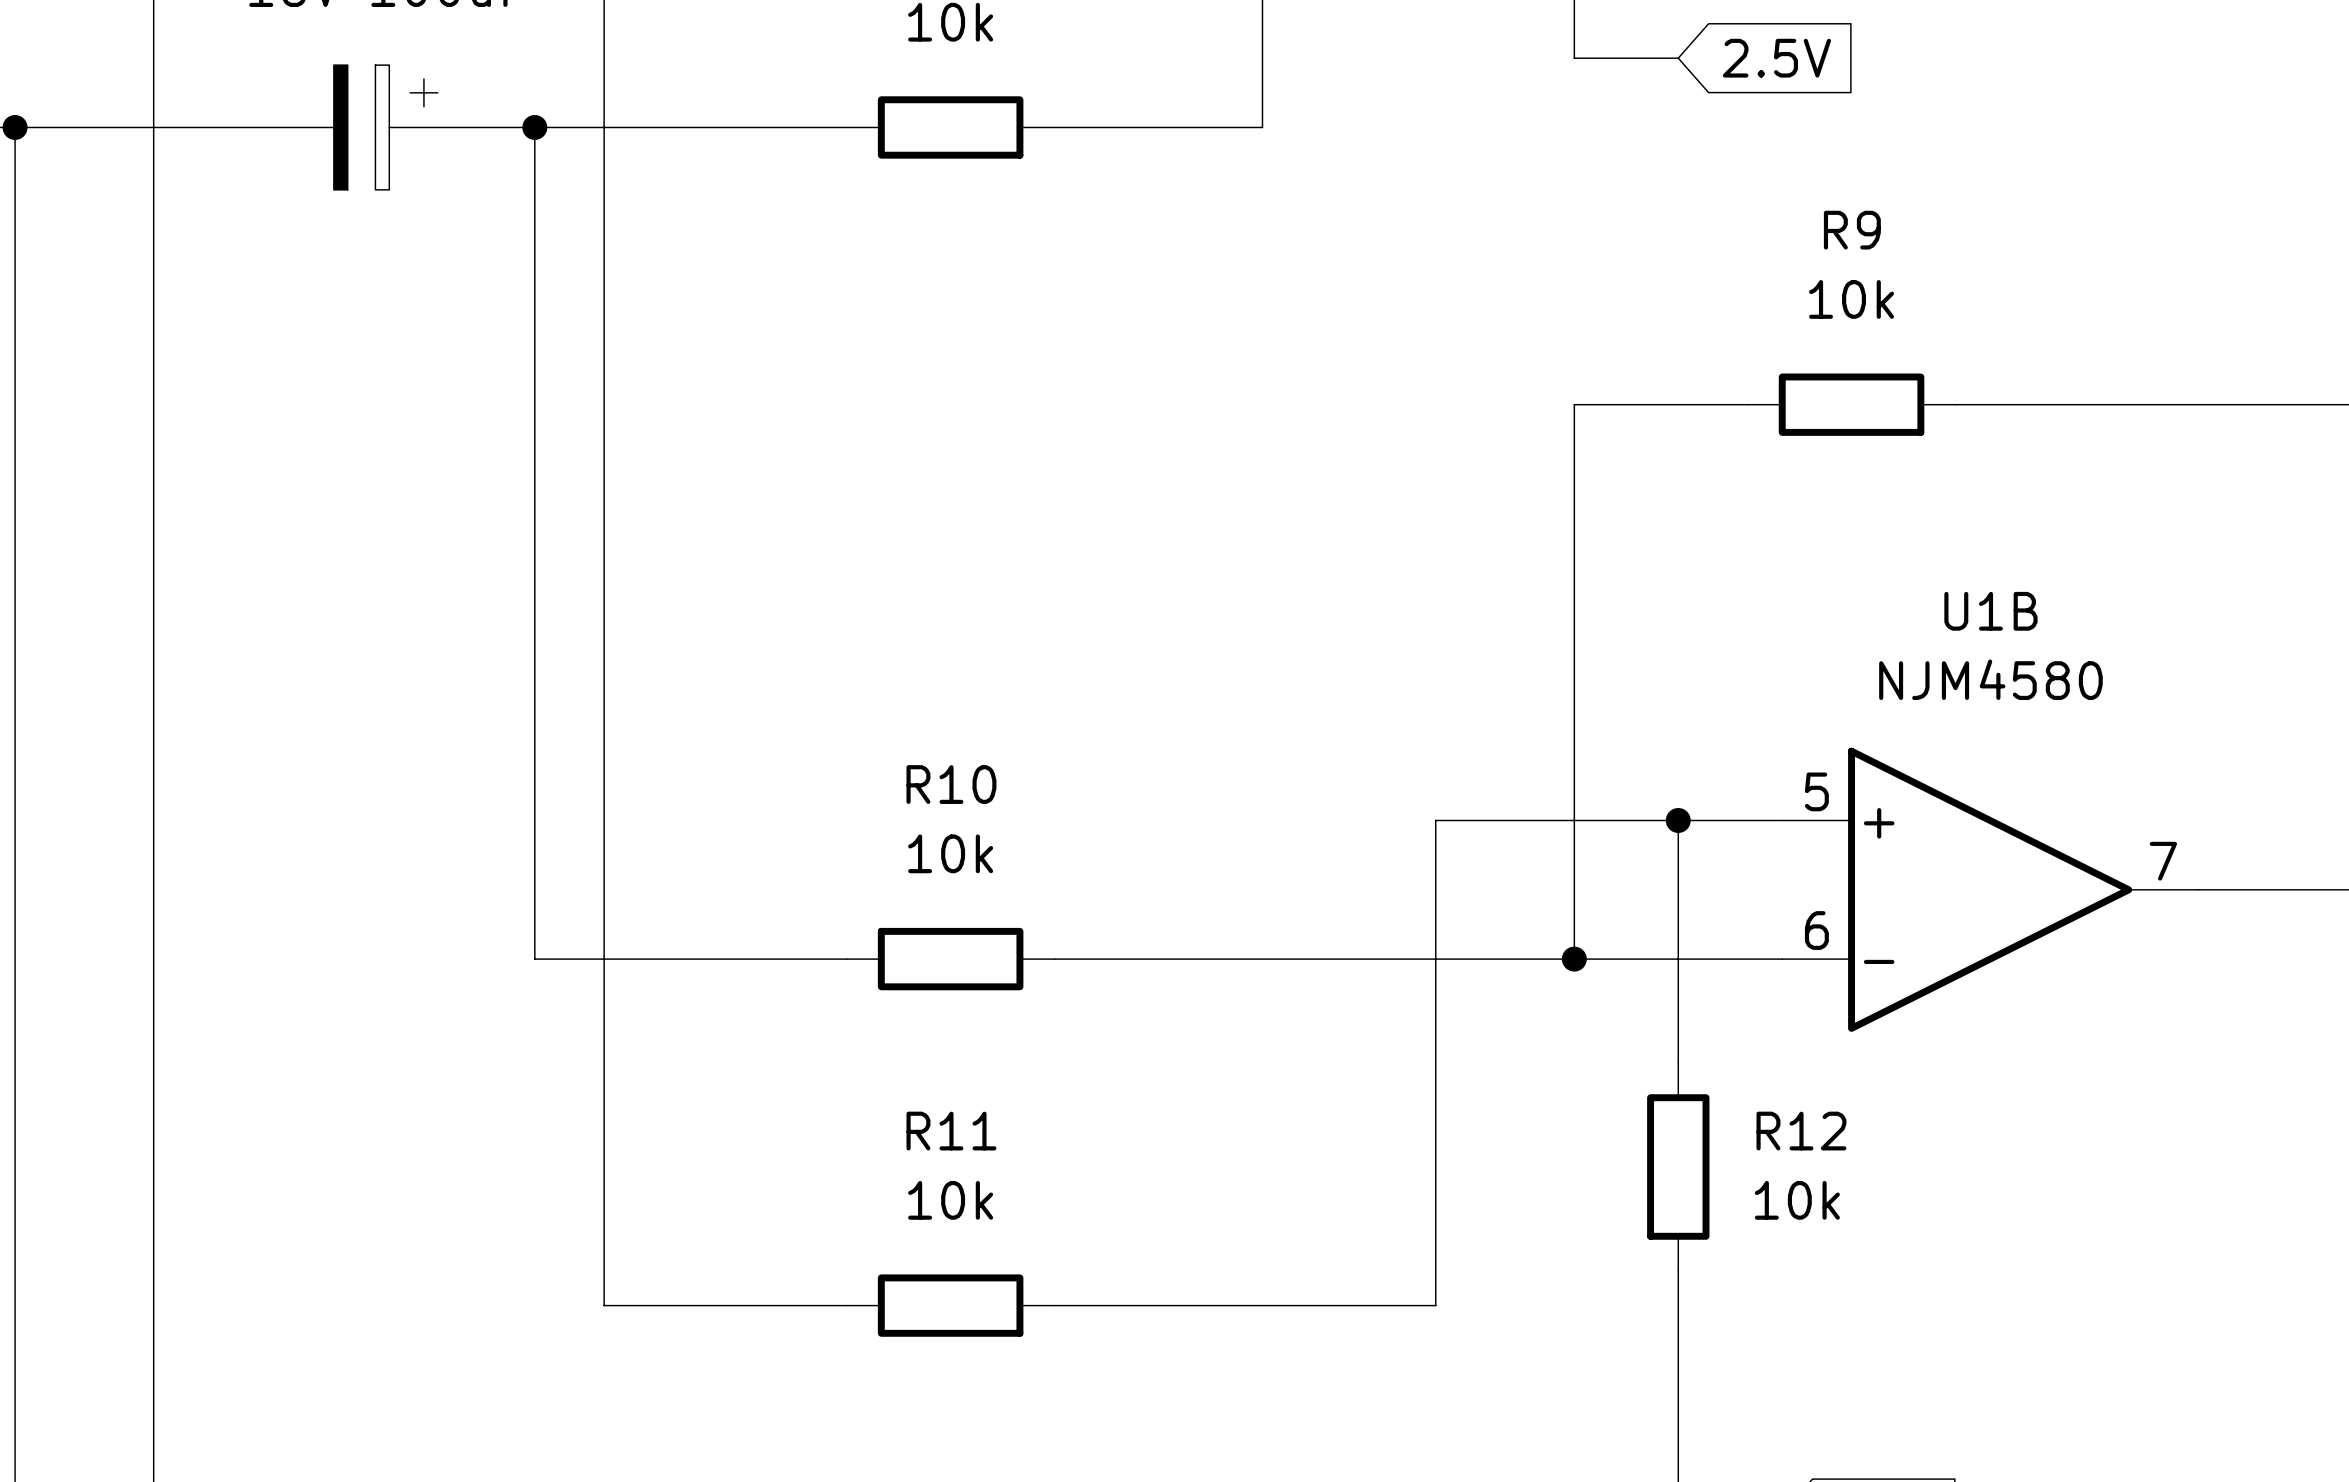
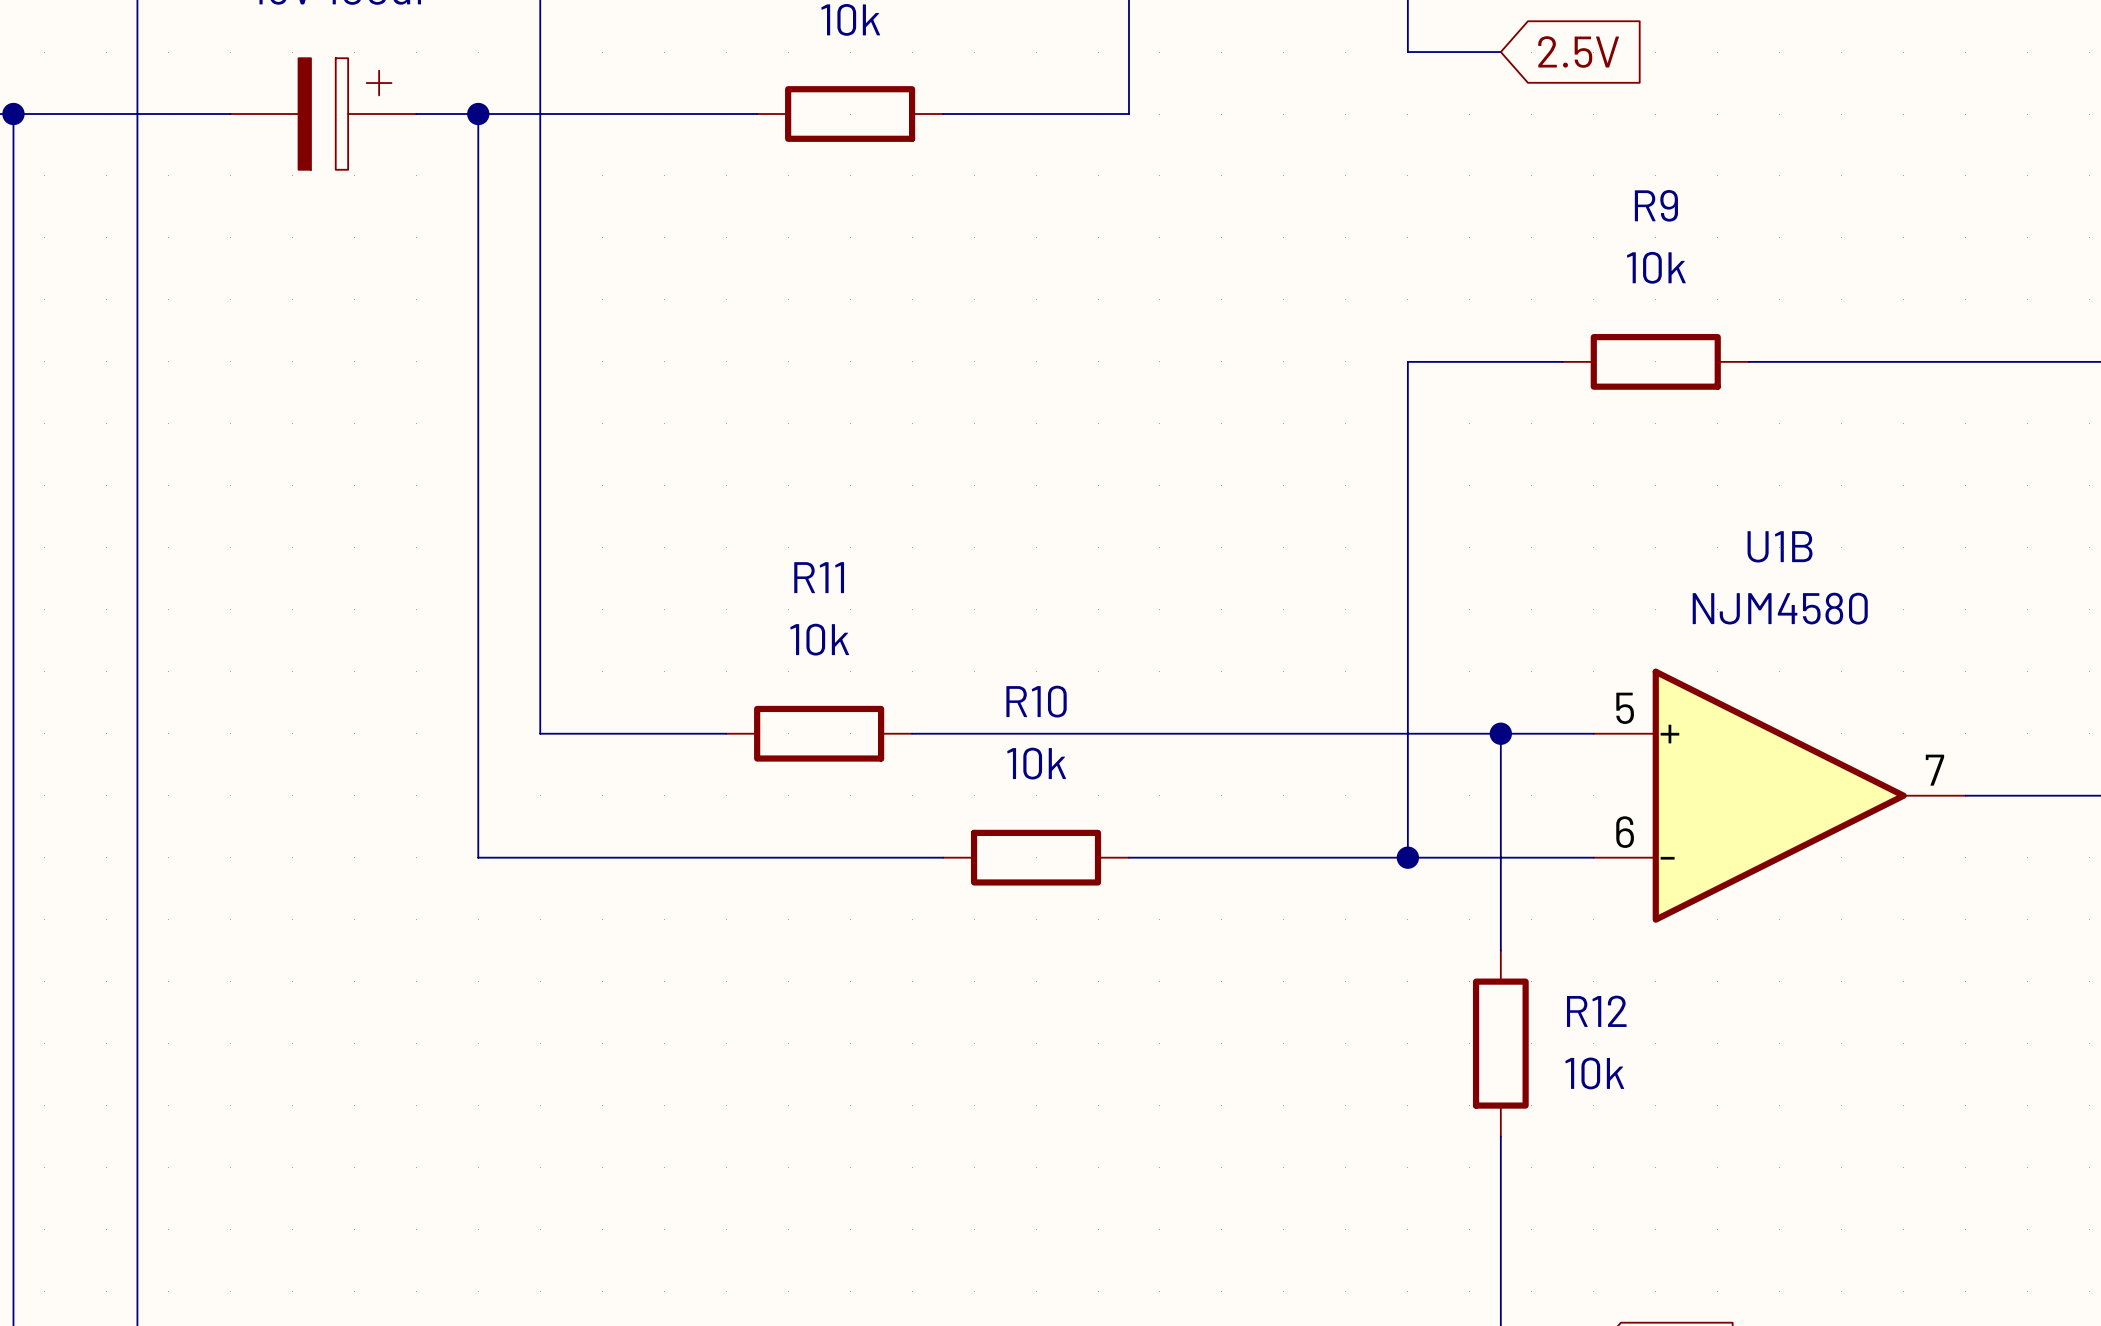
wire: (604, 820) (604, 1305) (846, 1305) -> (540, 733) (726, 733)
wire: (1435, 820) (1435, 1305) (1054, 1305) -> (1283, 733) (912, 733)
R10 position: (950, 959) -> (1036, 857)
wire: (1054, 959) (1262, 959) -> (943, 857) (757, 857)
R11 position: (950, 1305) -> (819, 733)

